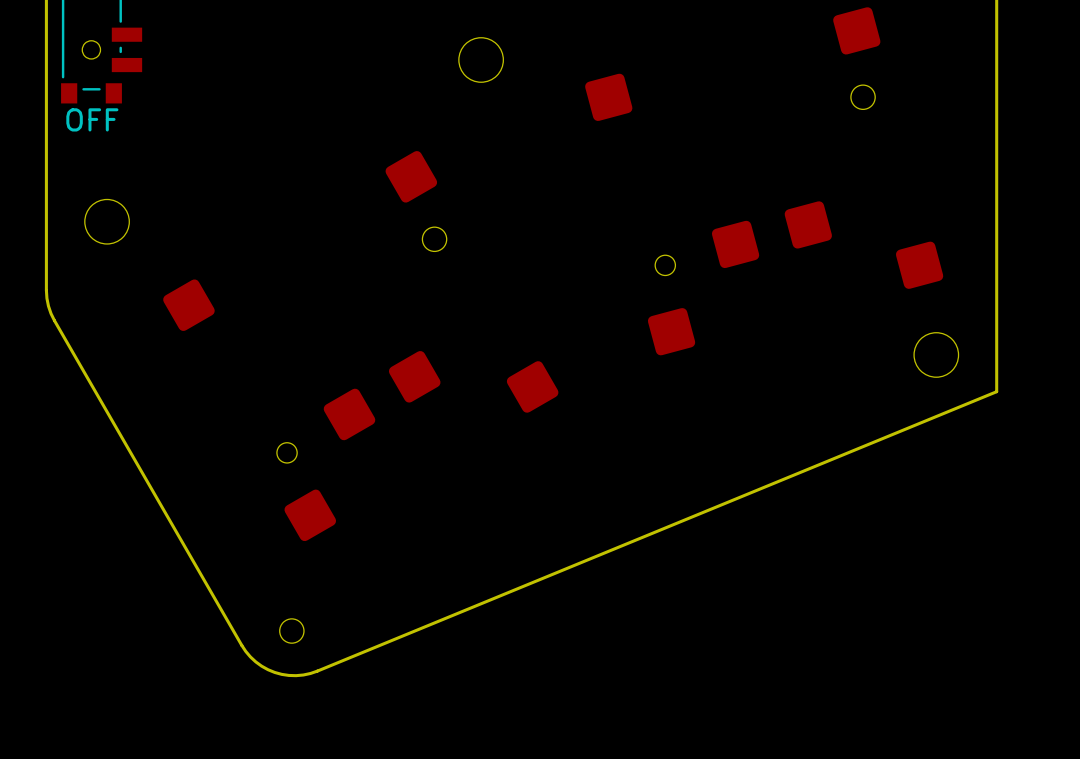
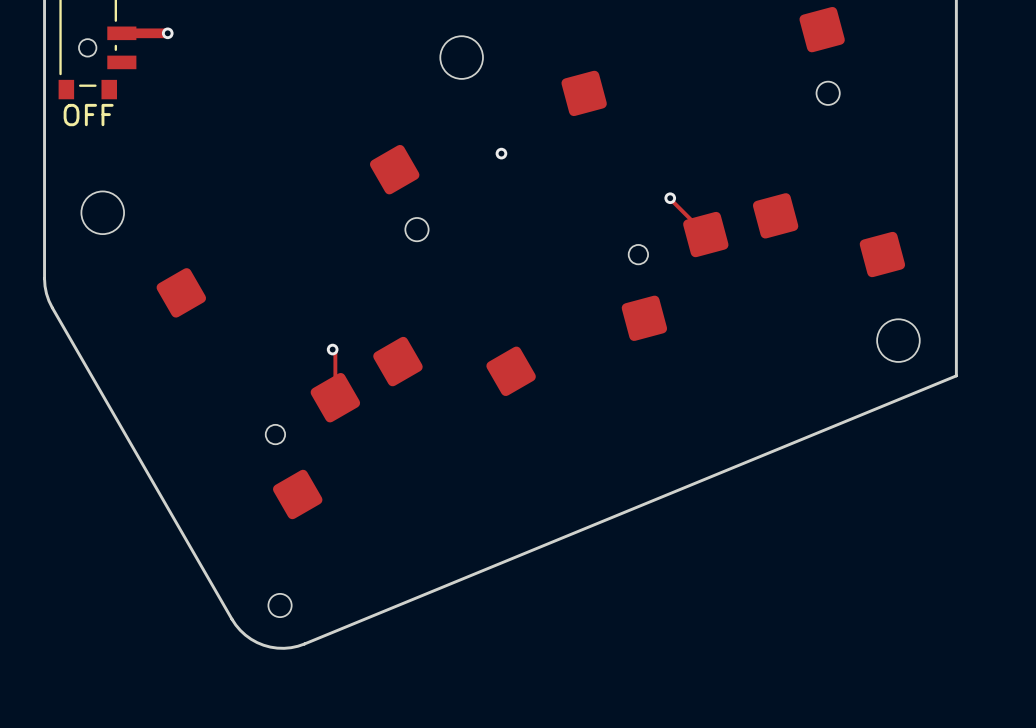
track: none -> (121, 33) (167, 33)
via: none -> (167, 33)
via: none -> (501, 153)
track: none -> (670, 198) (705, 234)
via: none -> (670, 198)
track: none -> (332, 349) (335, 352) (335, 397)
via: none -> (332, 349)

